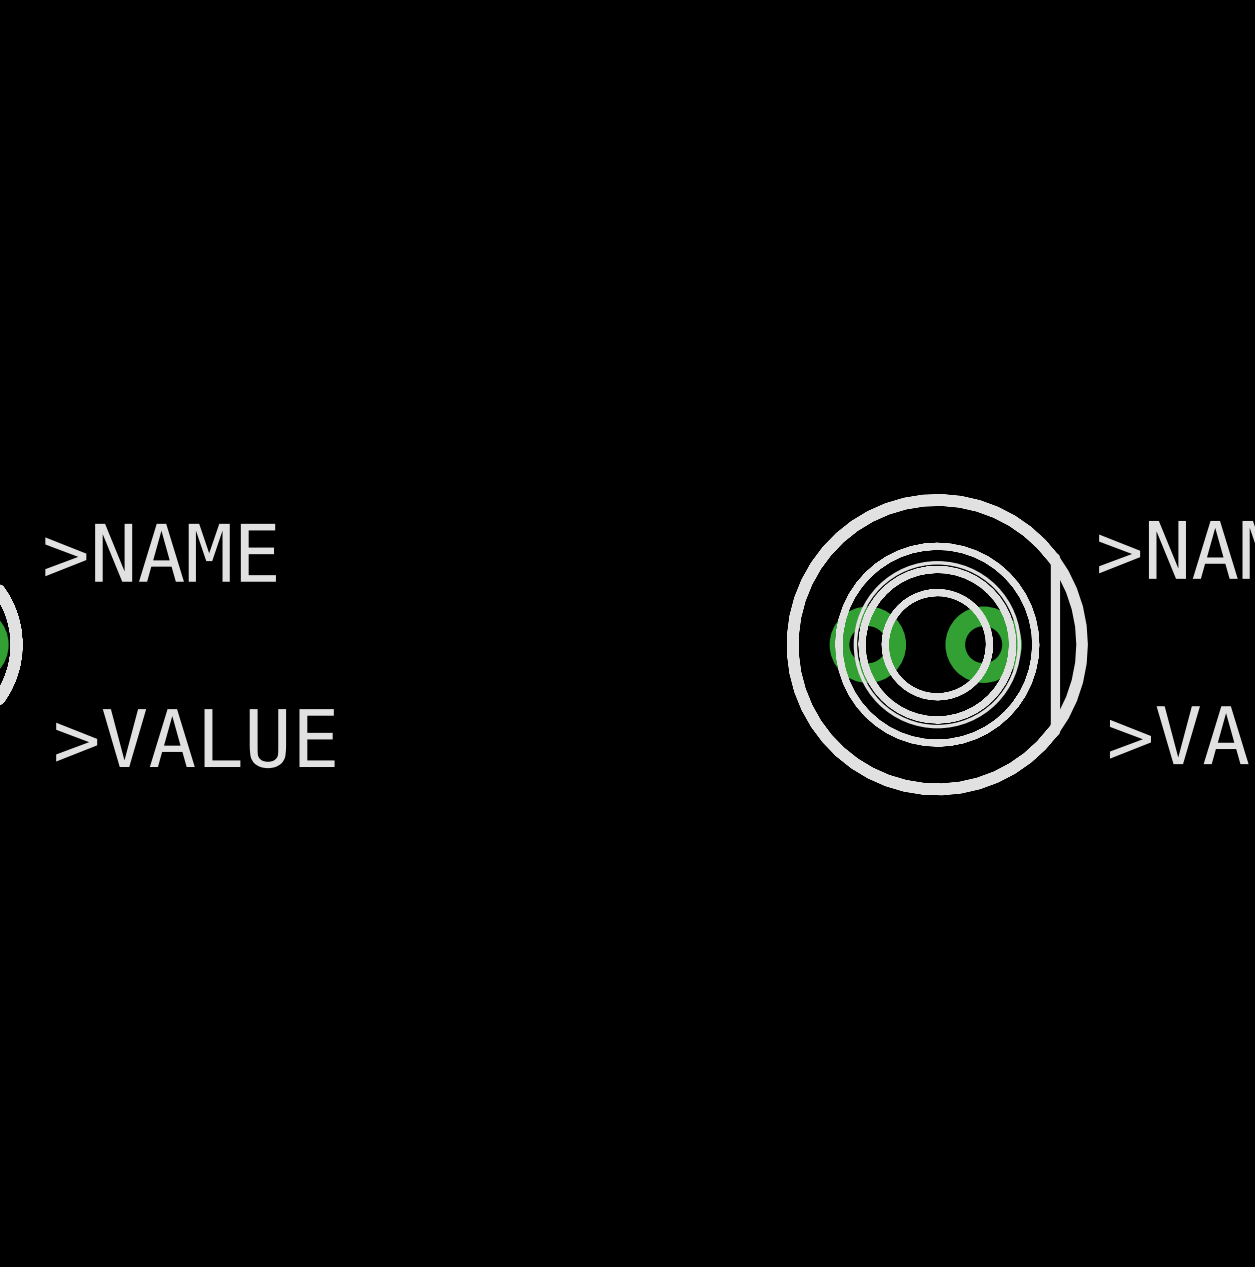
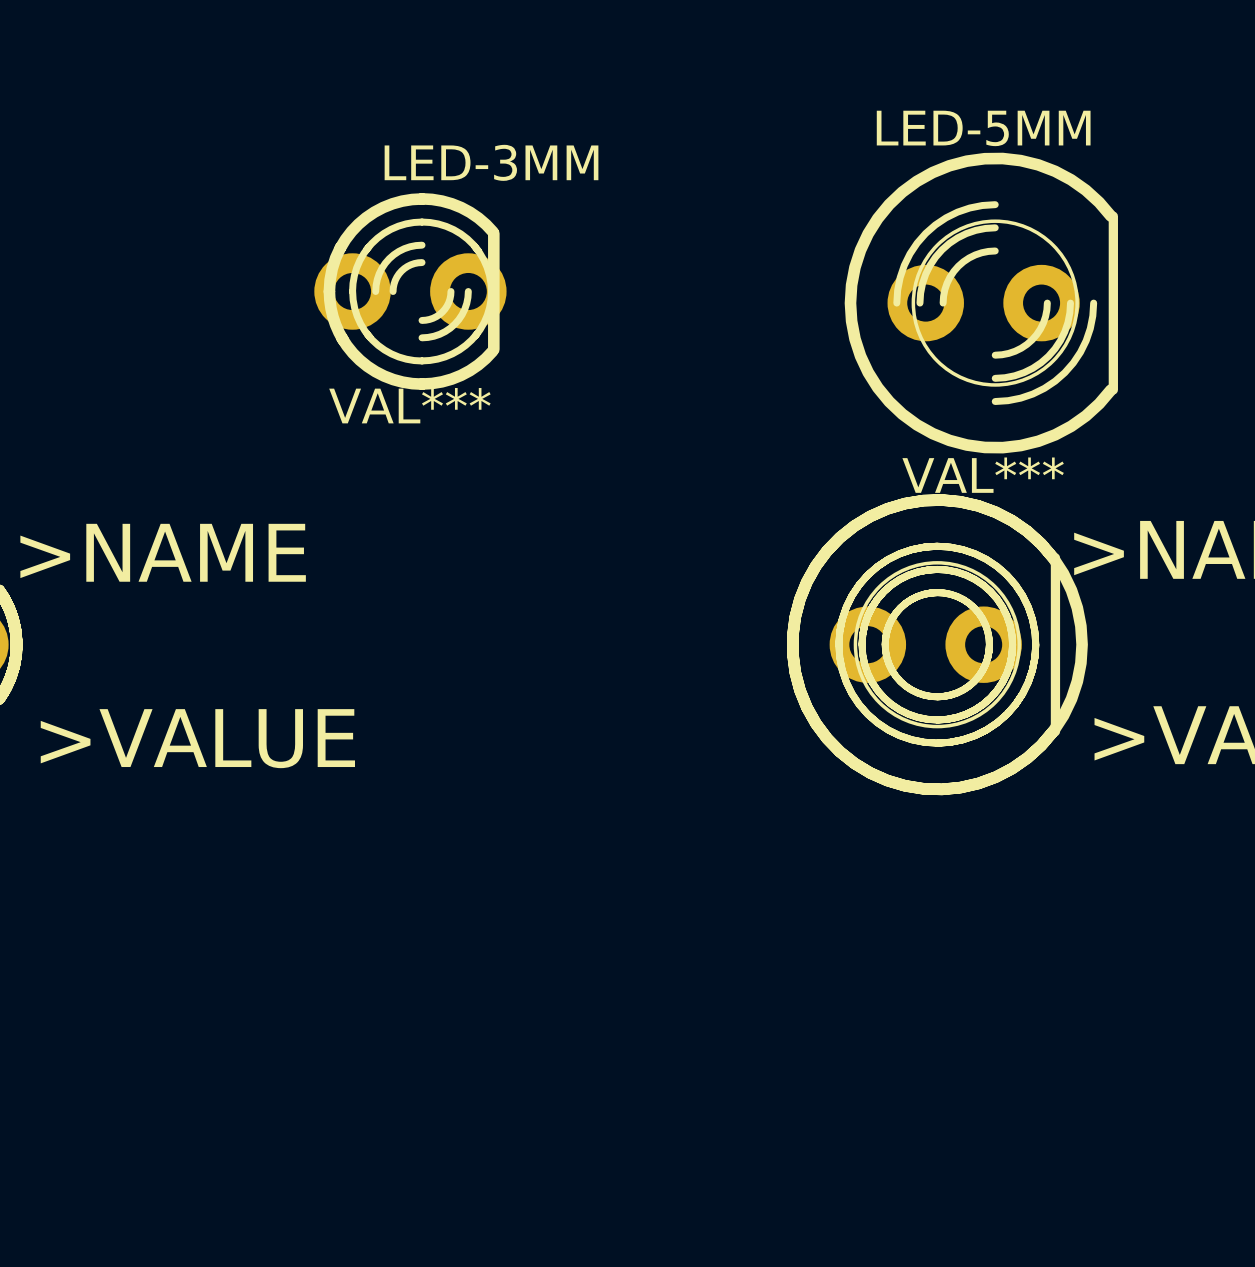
LED-3MM: none -> VAL*** (410, 291)
LED-5MM: none -> VAL*** (981, 303)

